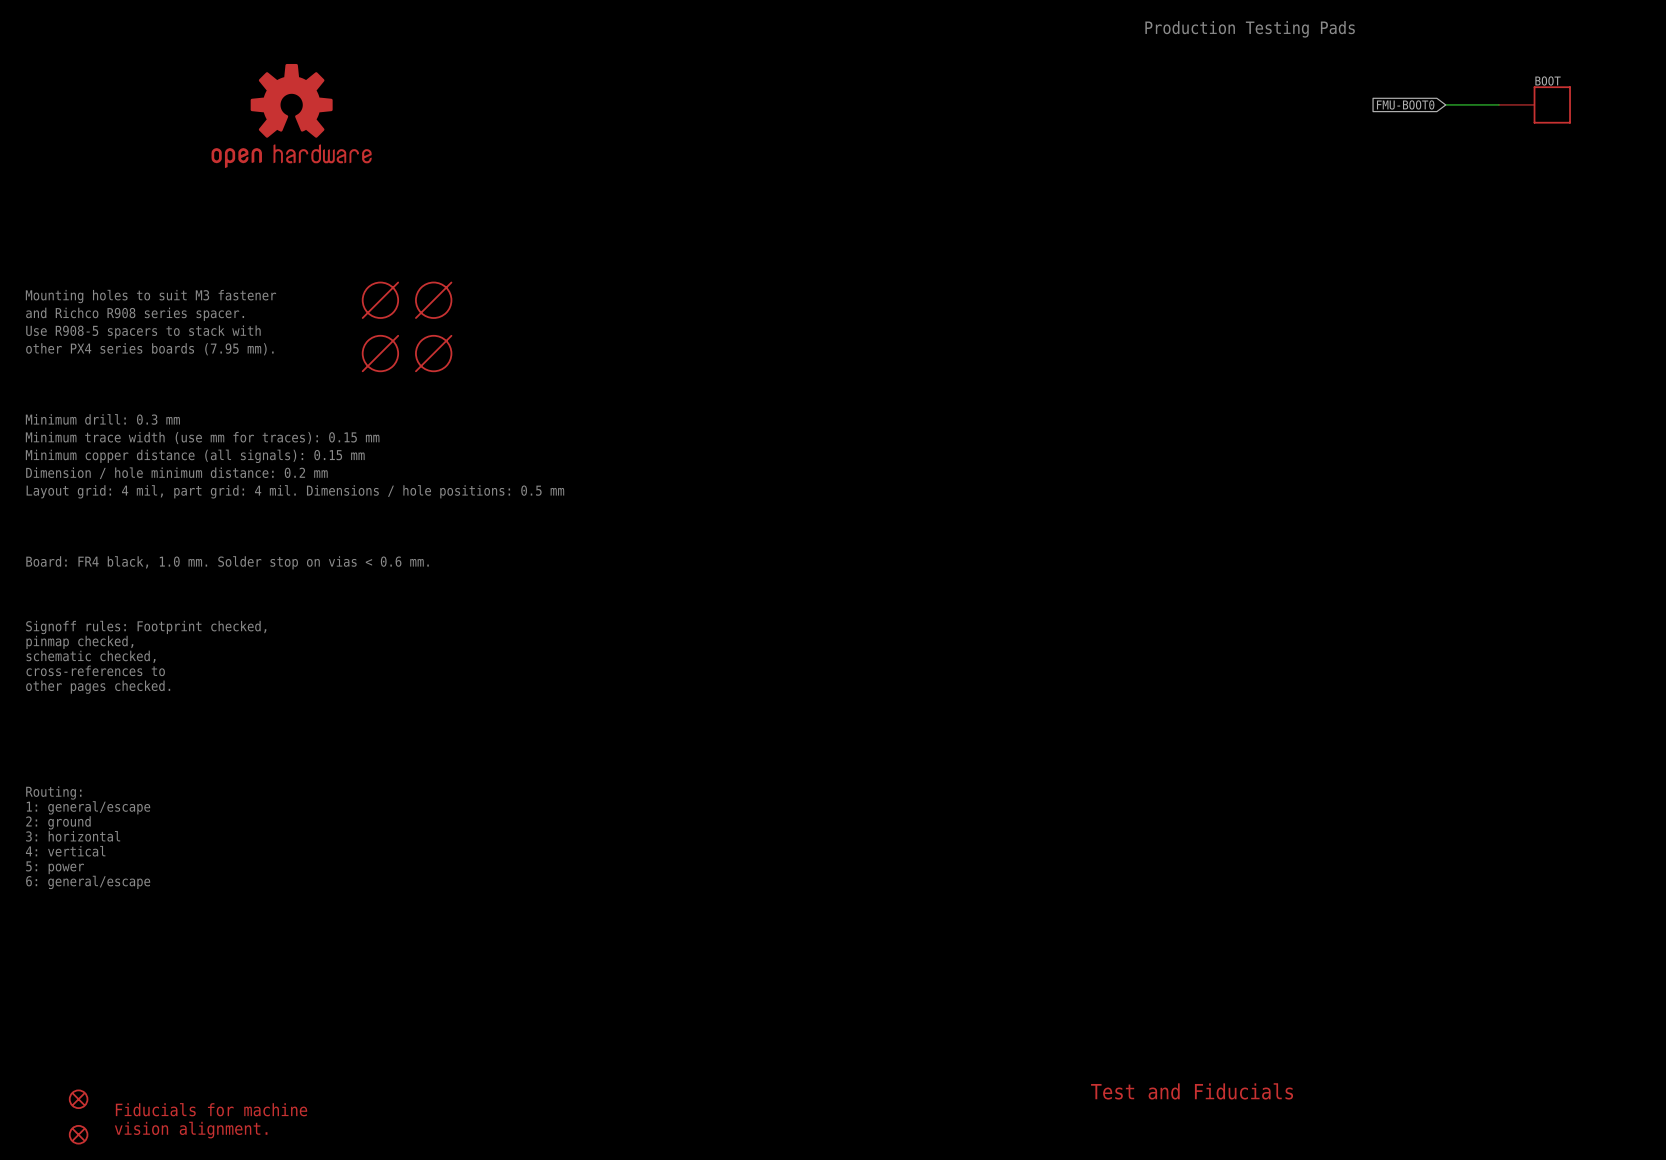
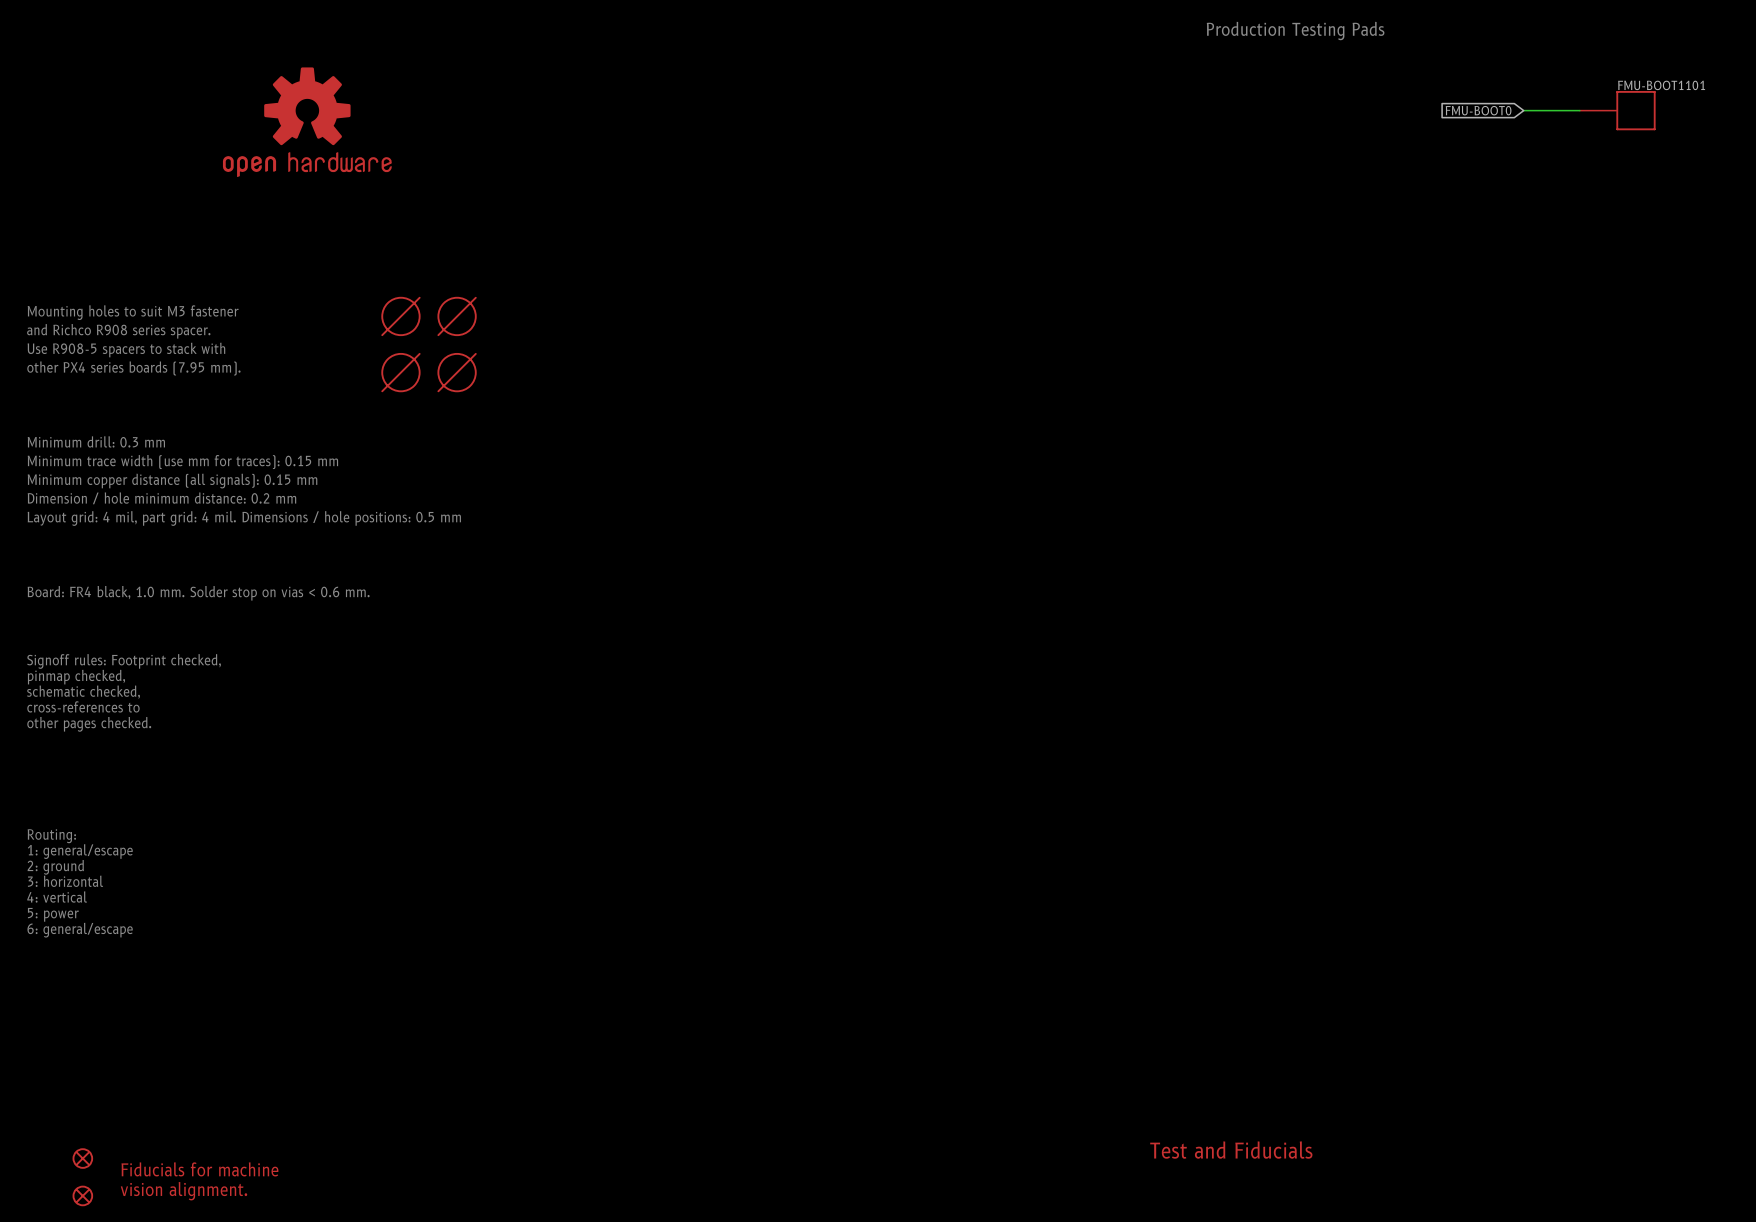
BOOT name: BOOT (1548, 80) -> FMU-BOOT1101 (1661, 85)

